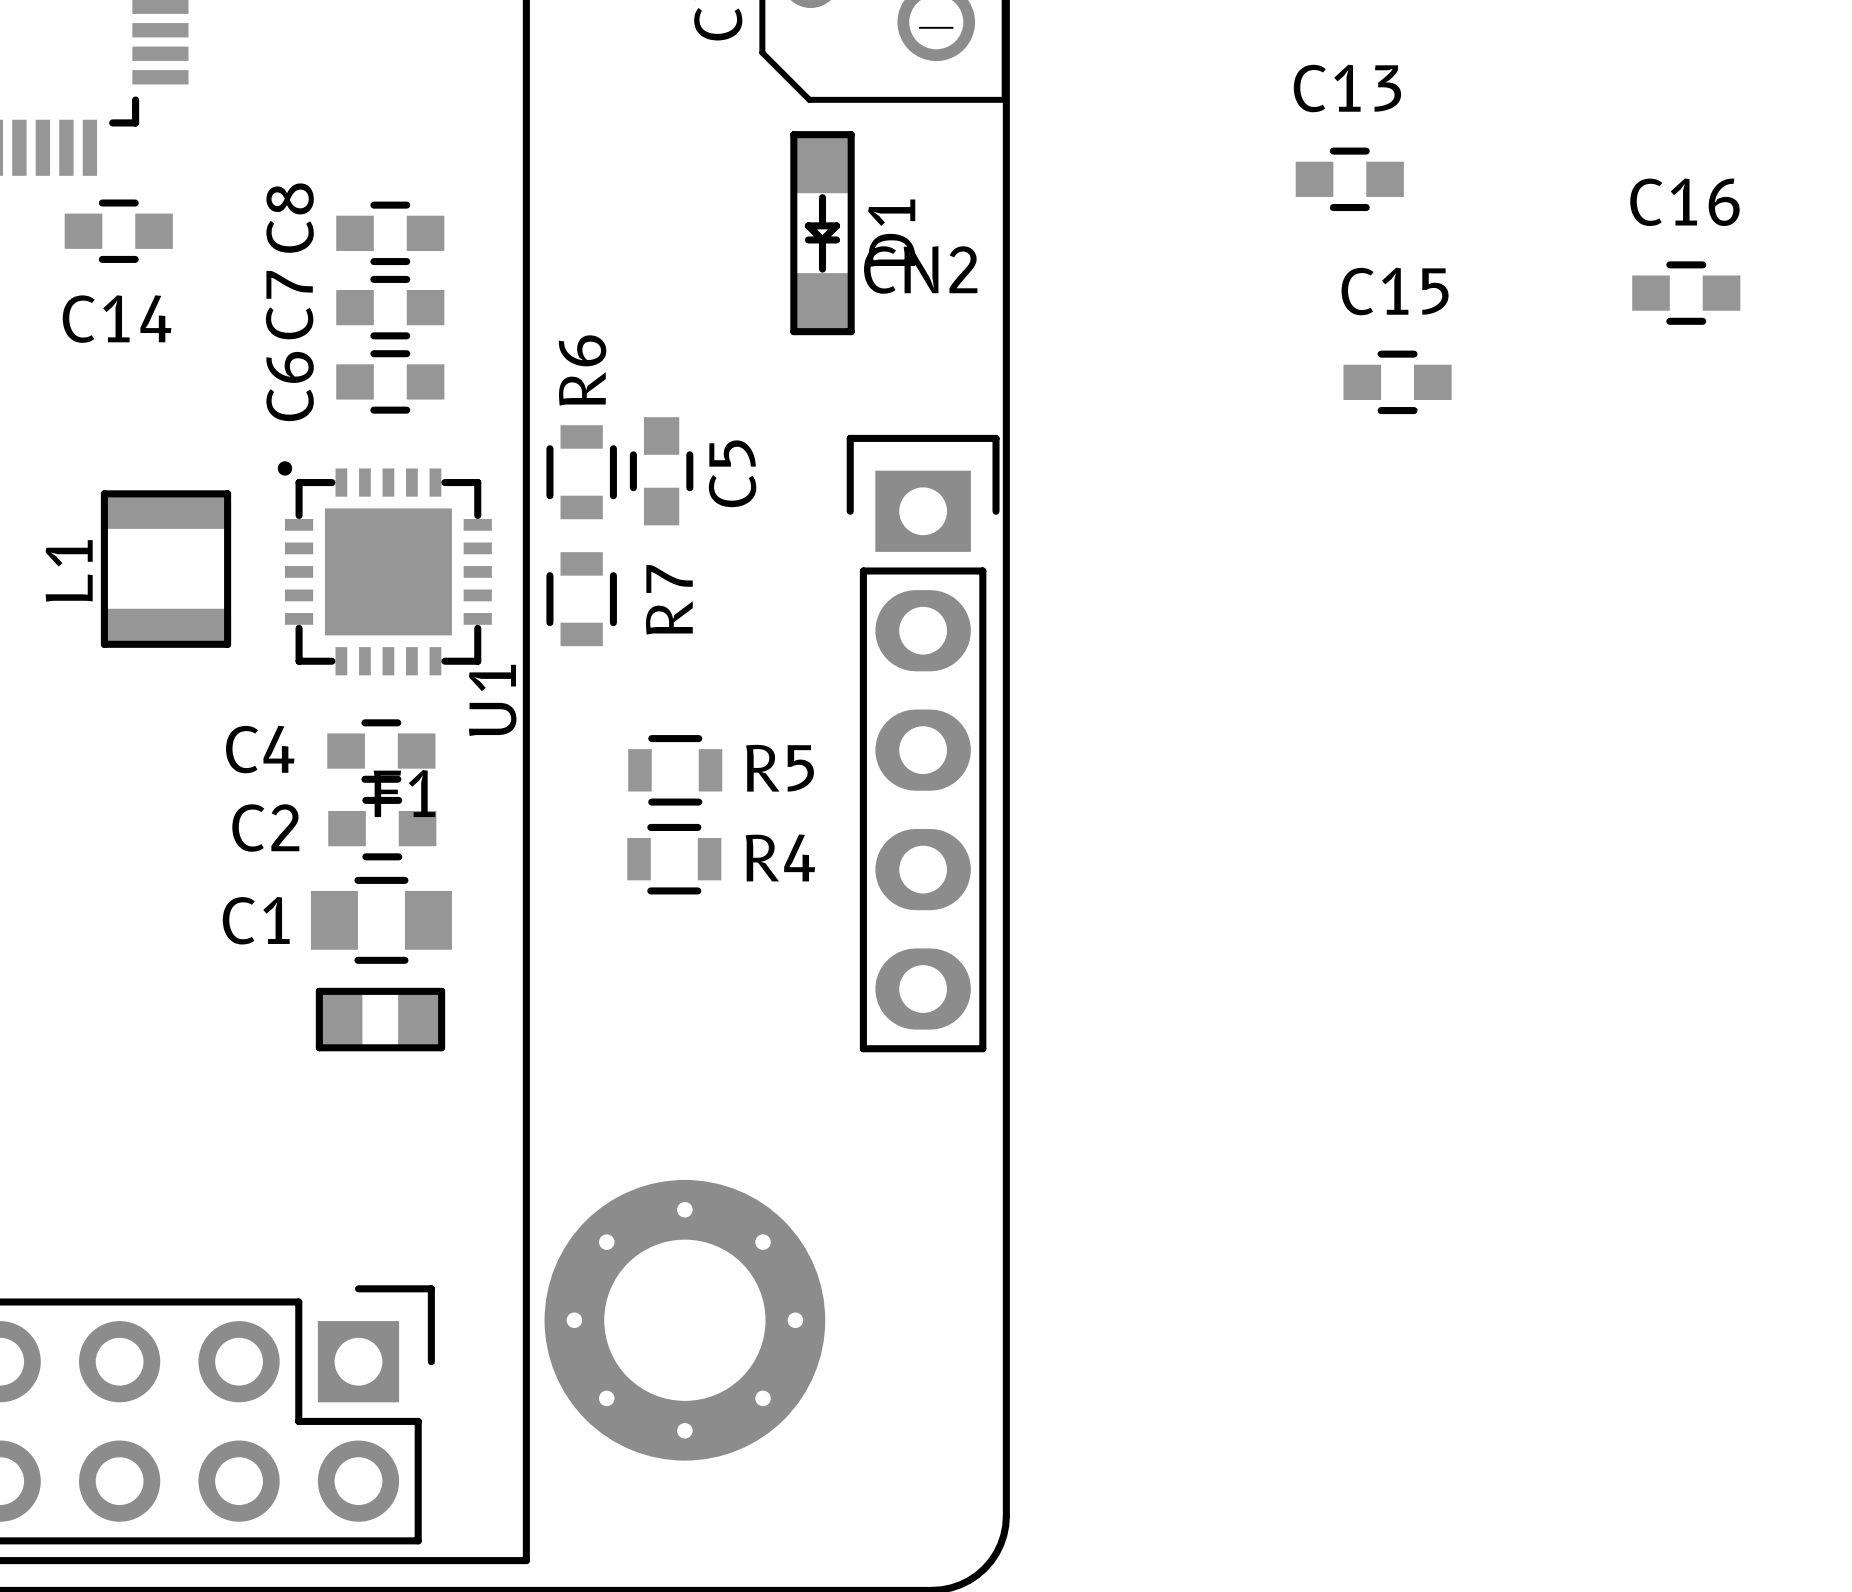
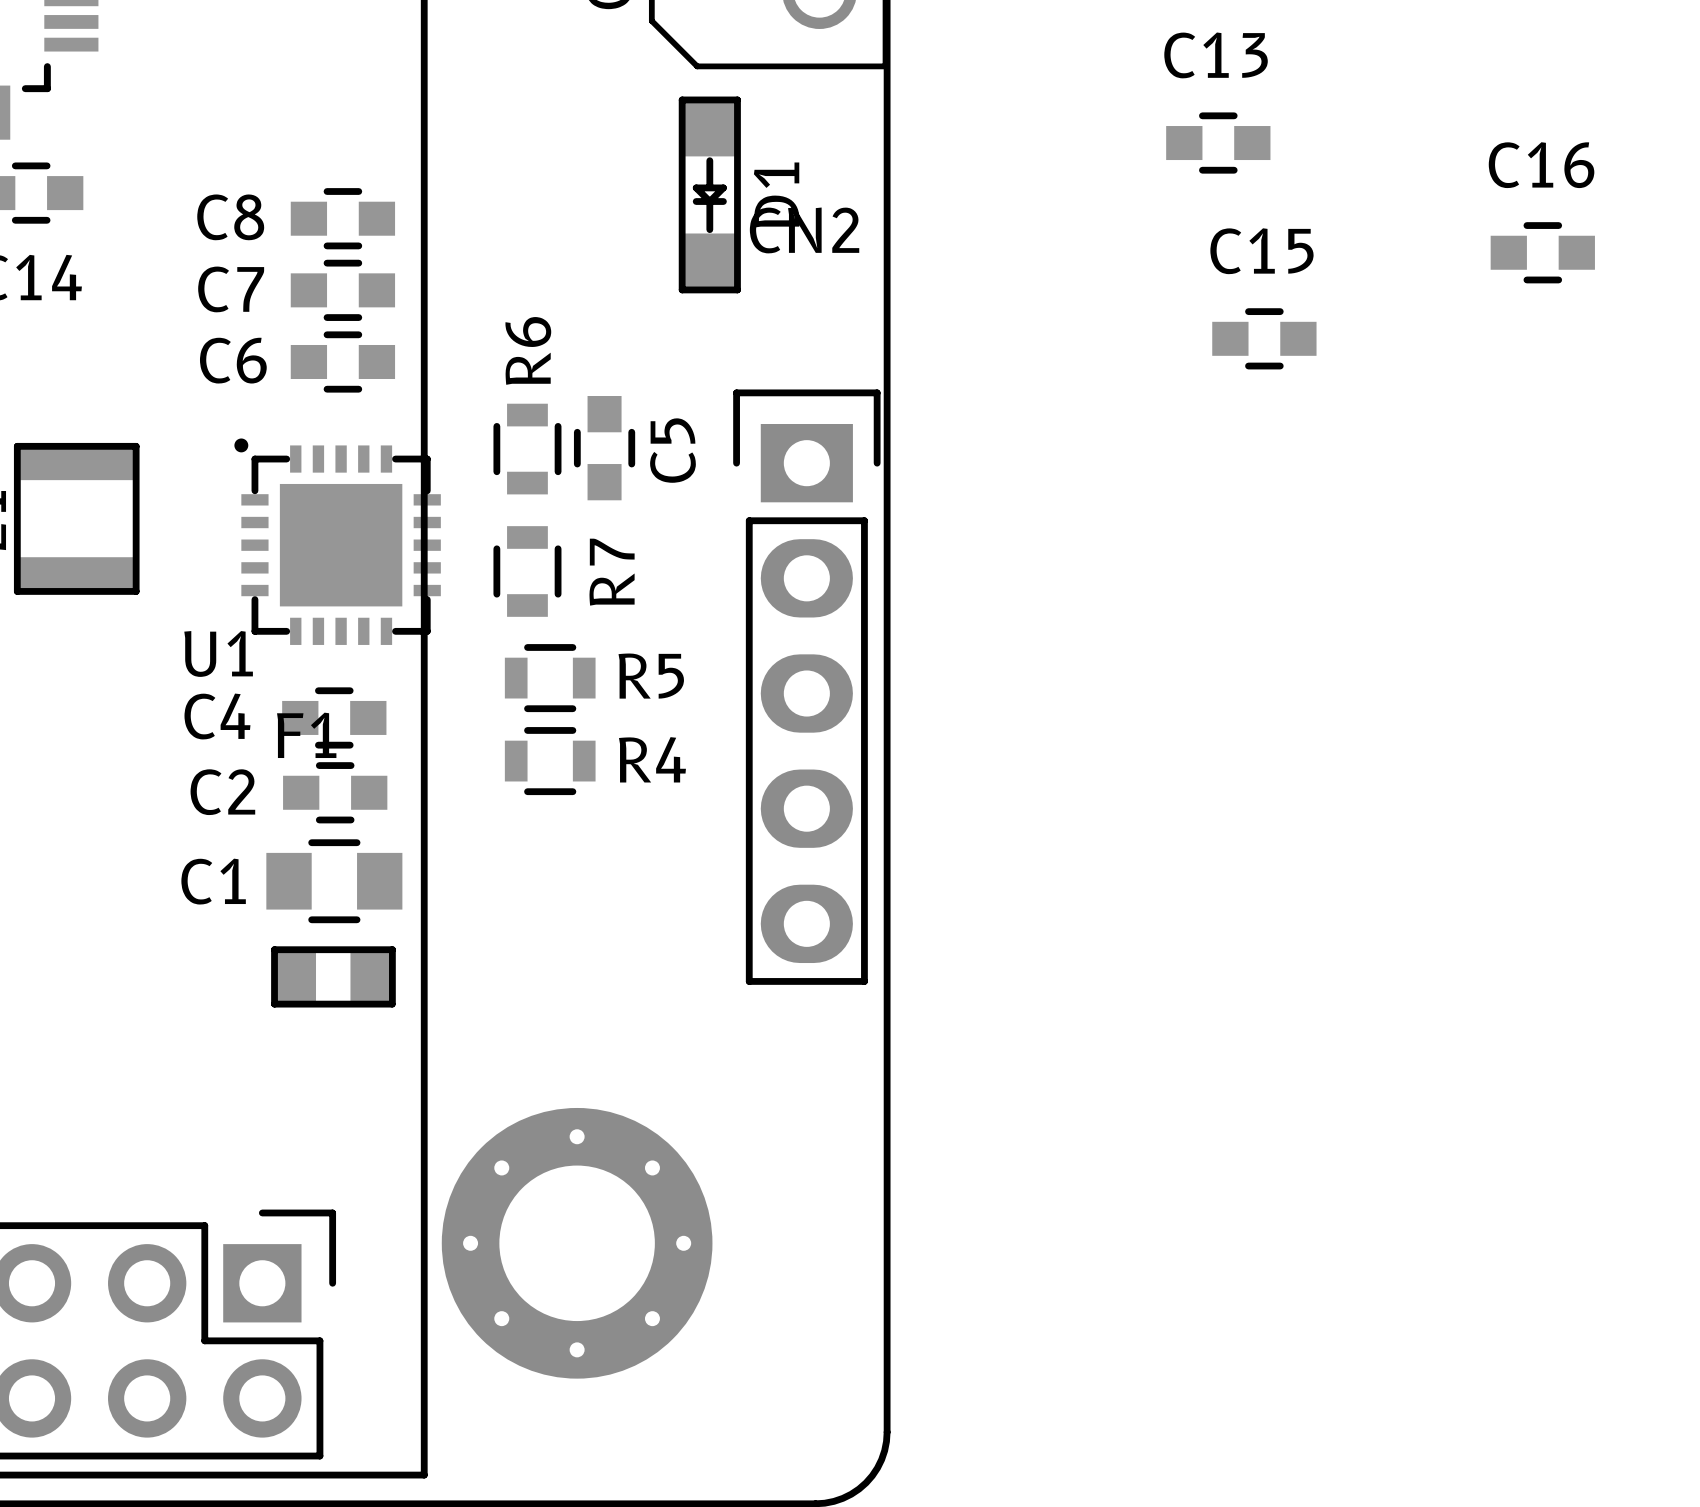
C8 name rotation: 0° (290, 218) -> 90° clockwise (230, 217)
C8 position: (390, 233) -> (342, 218)
C7 name rotation: 0° (289, 305) -> 90° clockwise (231, 289)
C7 position: (390, 307) -> (342, 290)
C6 position: (390, 381) -> (342, 362)
C6 name rotation: 0° (290, 386) -> 90° clockwise (233, 360)
C5 position: (661, 471) -> (604, 448)
R6 position: (581, 472) -> (527, 449)
U1 position: (384, 568) -> (337, 541)
R7 position: (581, 599) -> (527, 571)
U1 name rotation: 0° (492, 700) -> 90° clockwise (218, 653)
U1 name position: U1 (492, 700) -> U1 (218, 653)
C4 position: (381, 751) -> (334, 717)
R5 position: (675, 770) -> (550, 678)
C2 position: (382, 828) -> (335, 792)
R4 position: (674, 859) -> (550, 761)
C1 position: (381, 920) -> (334, 881)
F1 position: (380, 1019) -> (333, 976)

